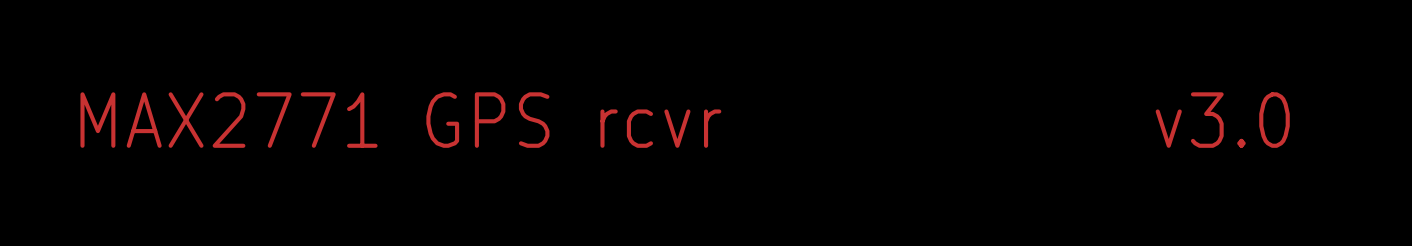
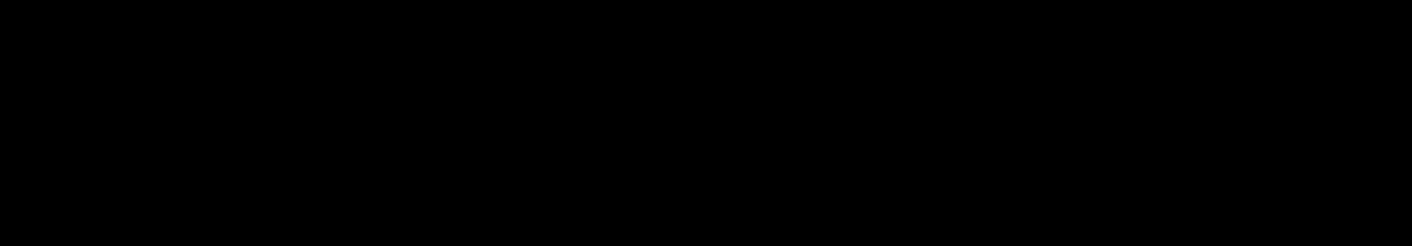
text: MAX2771 GPS rcvr (400, 120) -> none
text: v3.0 (1222, 120) -> none

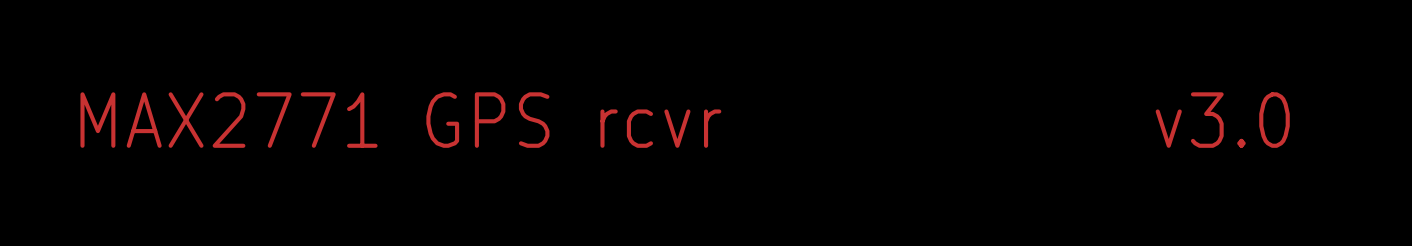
text: none -> MAX2771 GPS rcvr (400, 120)
text: none -> v3.0 (1222, 120)

